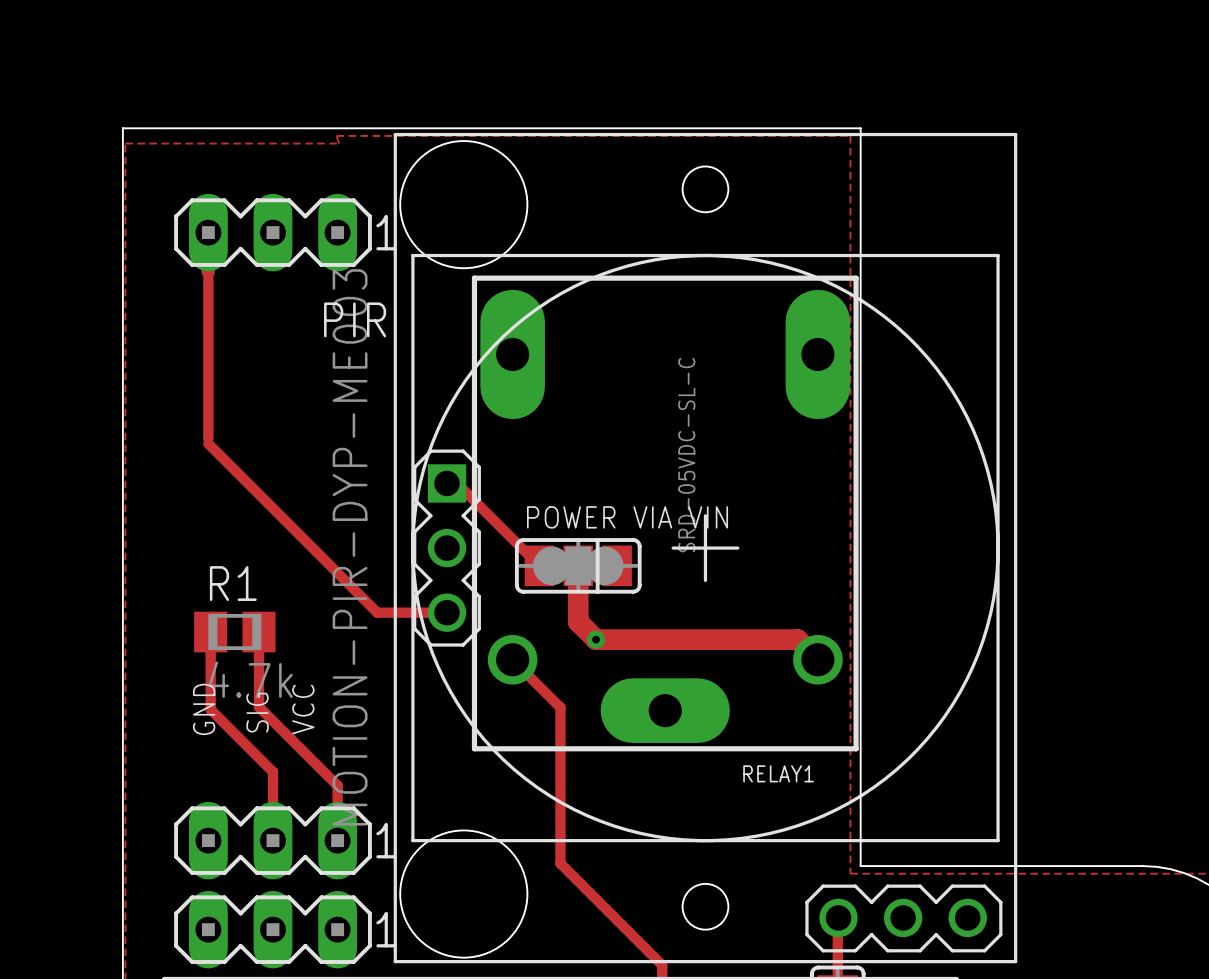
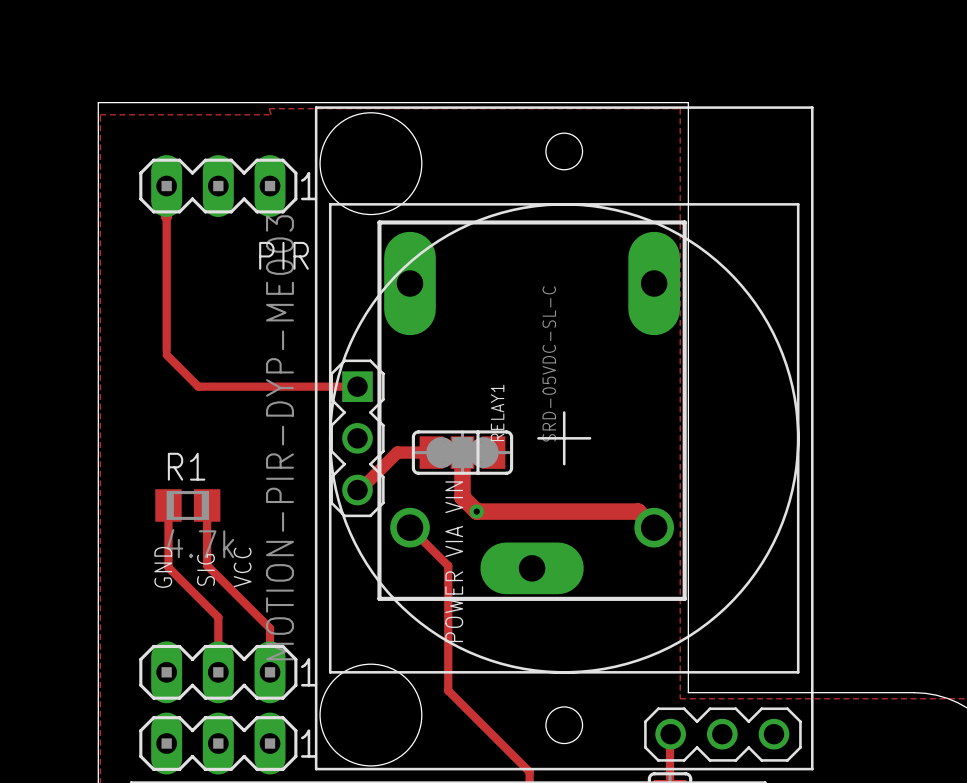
track: (248, 483) (377, 612) (447, 612) -> (198, 386) (357, 386)
track: (447, 483) (457, 483) (539, 565) -> (357, 490) (358, 491) (397, 452) (431, 452)
text rotation: 0° (627, 517) -> 90° counterclockwise (454, 561)
RELAY1 name rotation: 0° (778, 773) -> 90° counterclockwise (497, 412)
RELAY1 name position: RELAY1 (778, 773) -> RELAY1 (497, 412)

